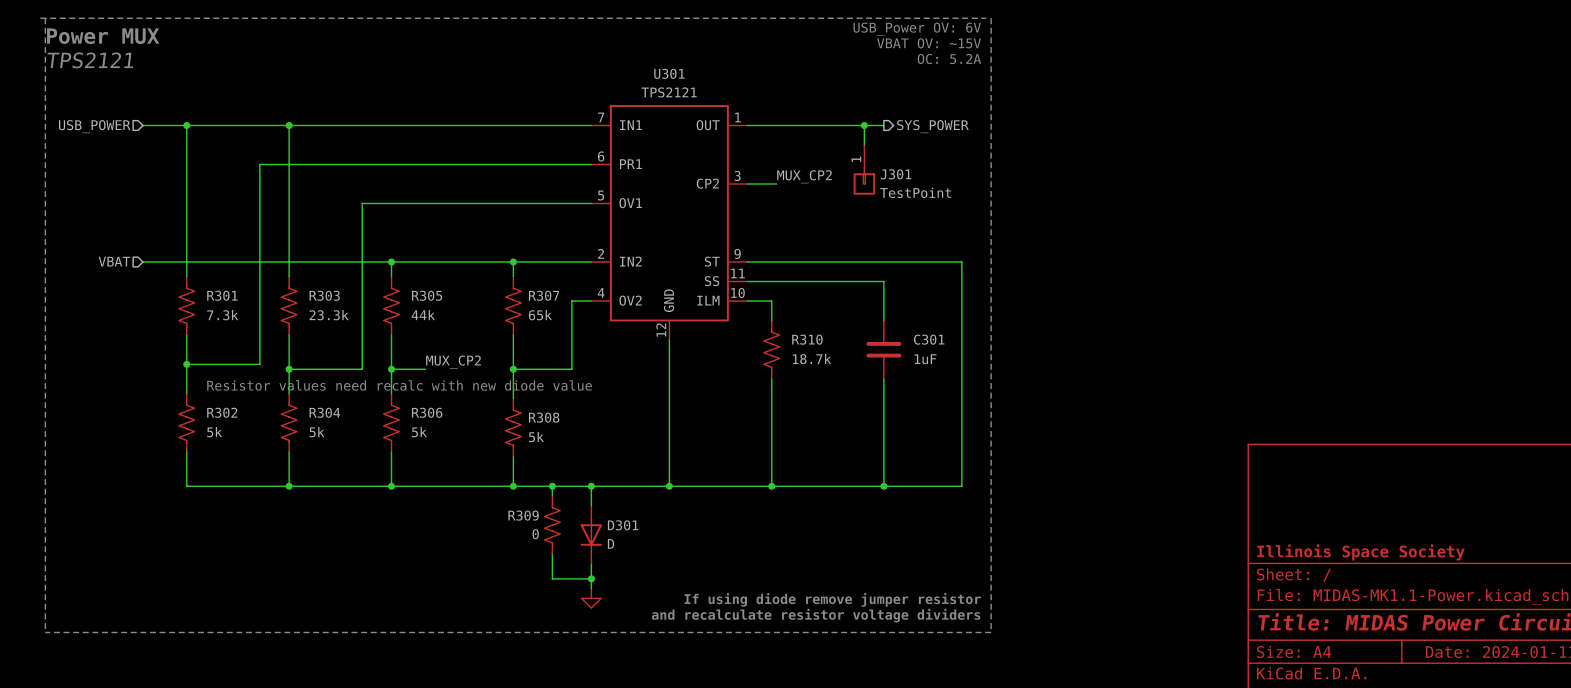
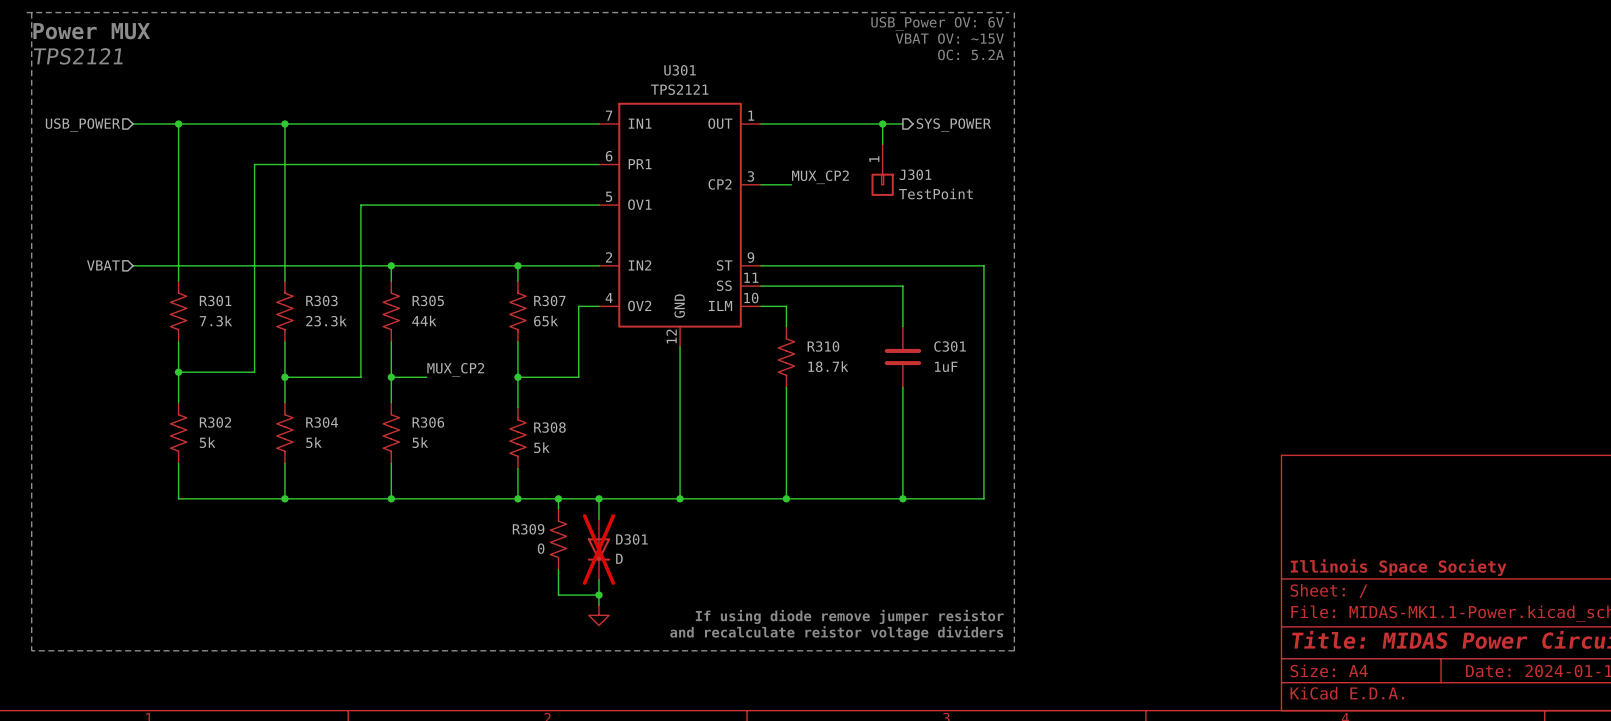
text: Resistor values need recalc with new diode value (399, 385) -> none
D301 do-not-place cross: none -> (598, 549)
text: and recalculate resistor voltage dividers (816, 615) -> and recalculate reistor voltage dividers (836, 633)

